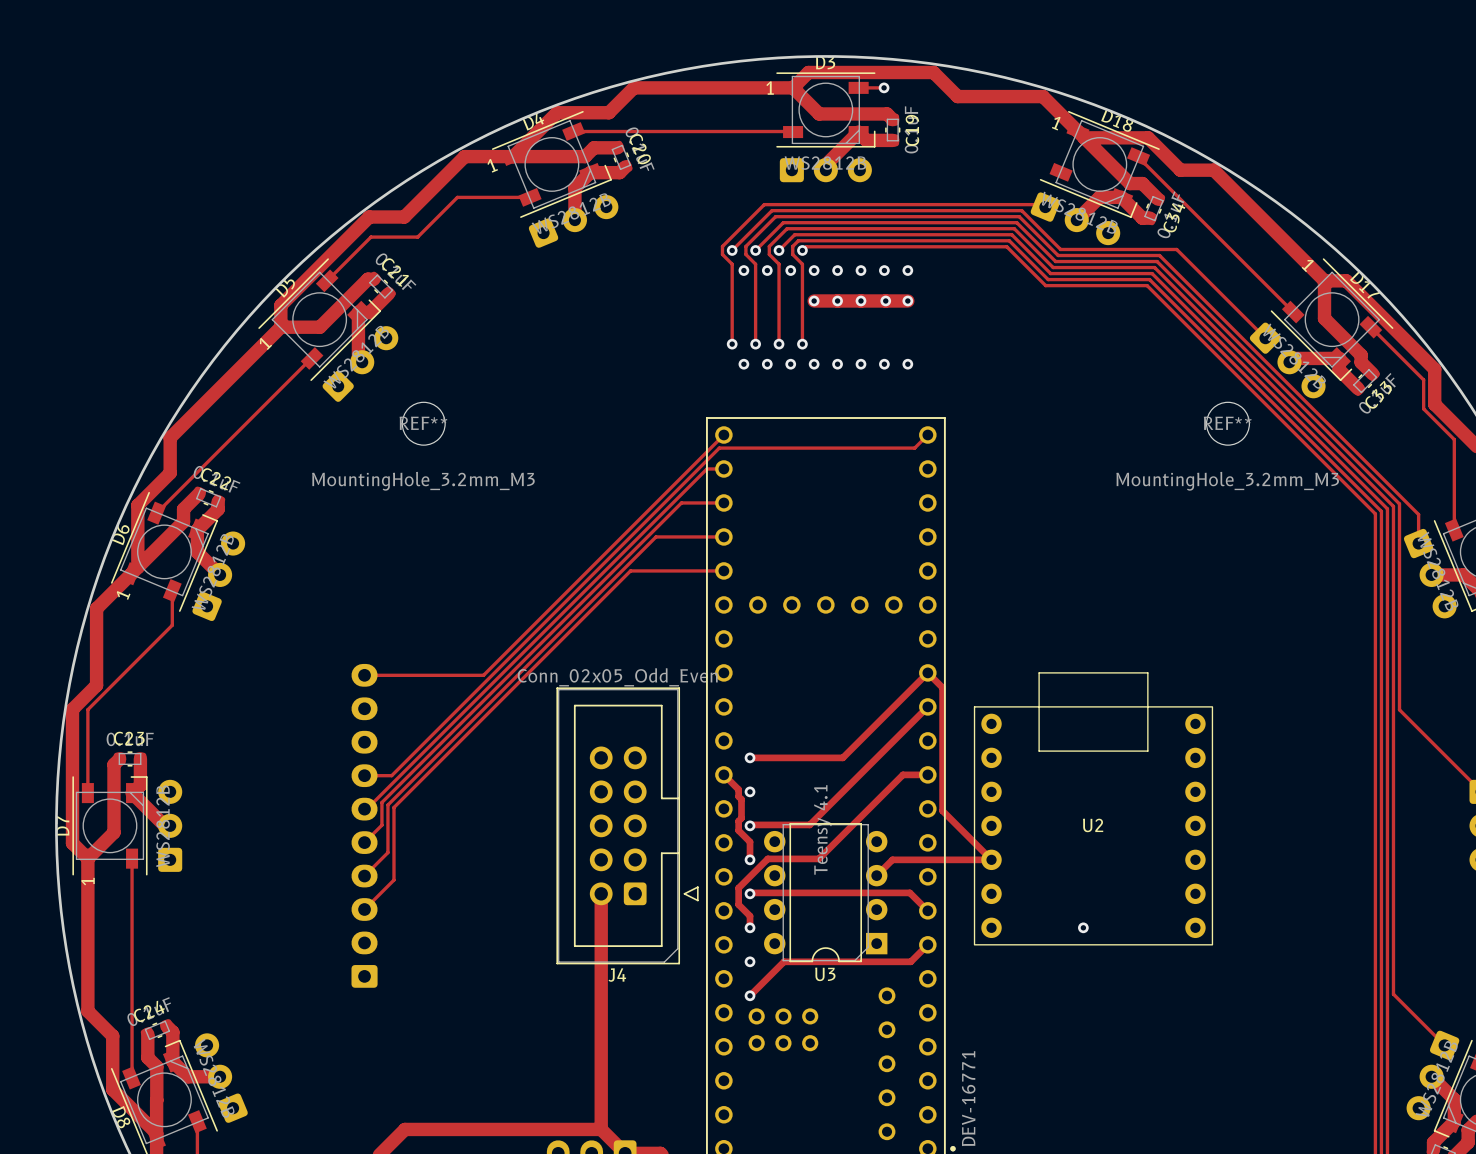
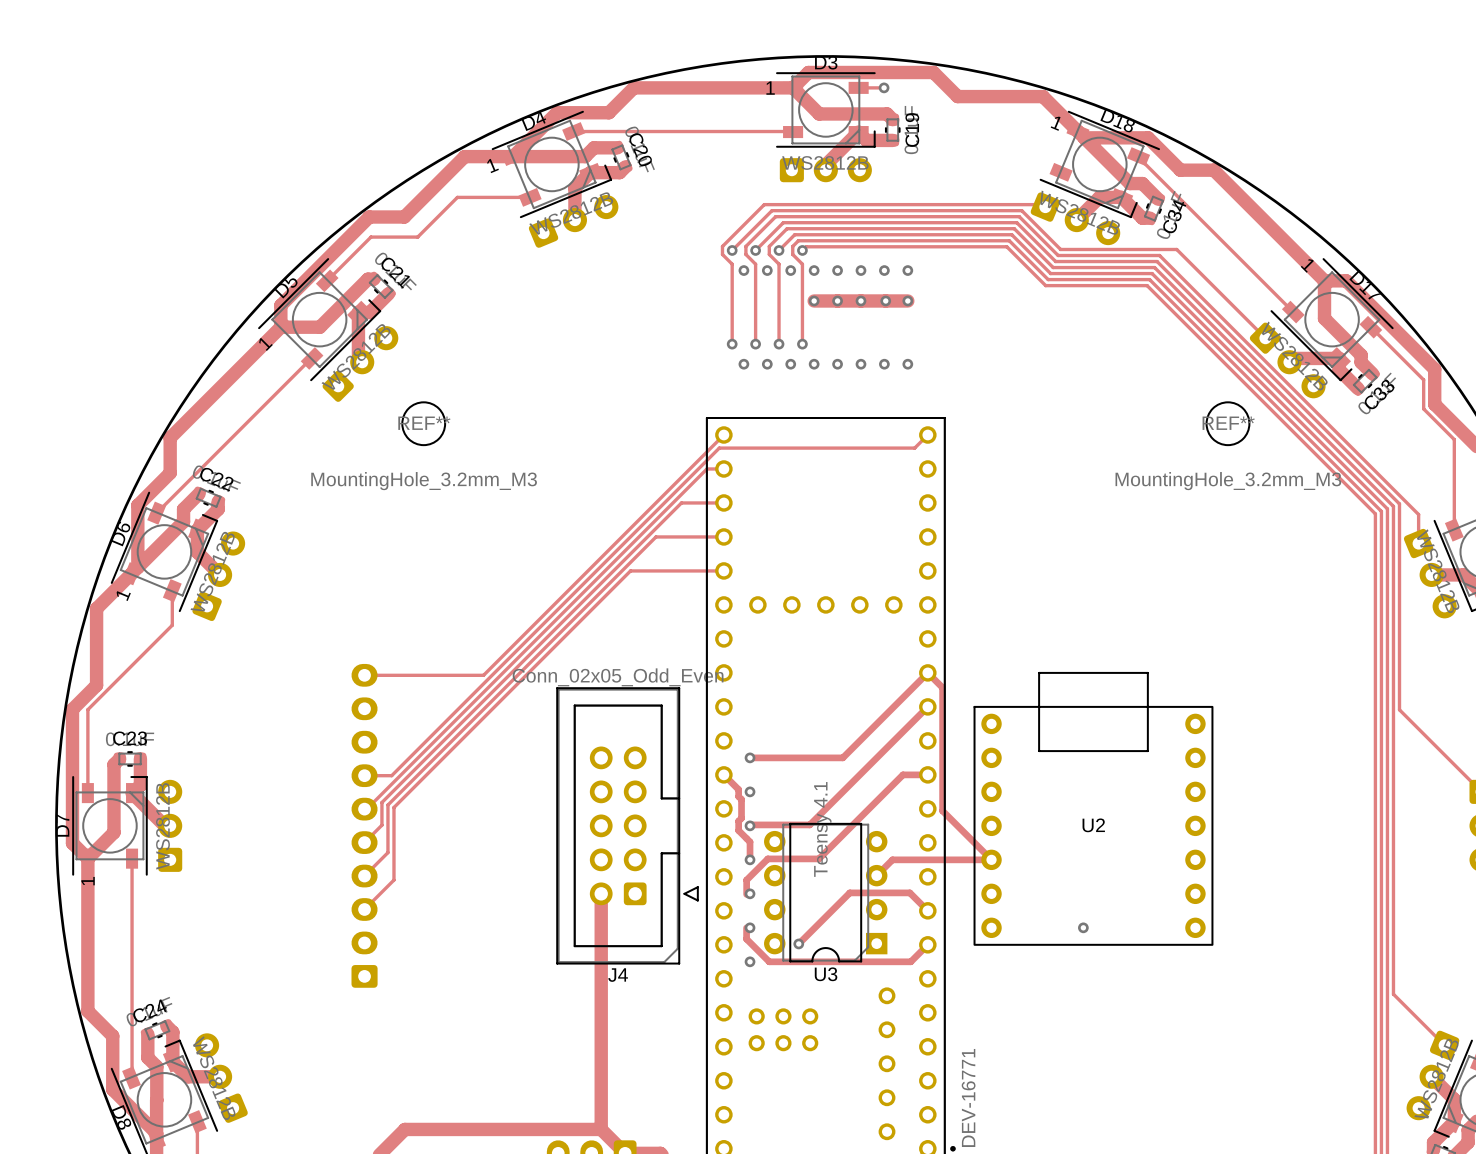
track: (746, 880) (738, 888) (738, 904) (750, 916) (750, 927) -> (746, 880) (746, 894)
track: (849, 892) (750, 893) -> (849, 892) (798, 943)
track: (784, 961) (750, 995) -> (784, 961) (769, 961) (746, 939) (746, 927)
via position: (750, 995) -> (798, 943)

